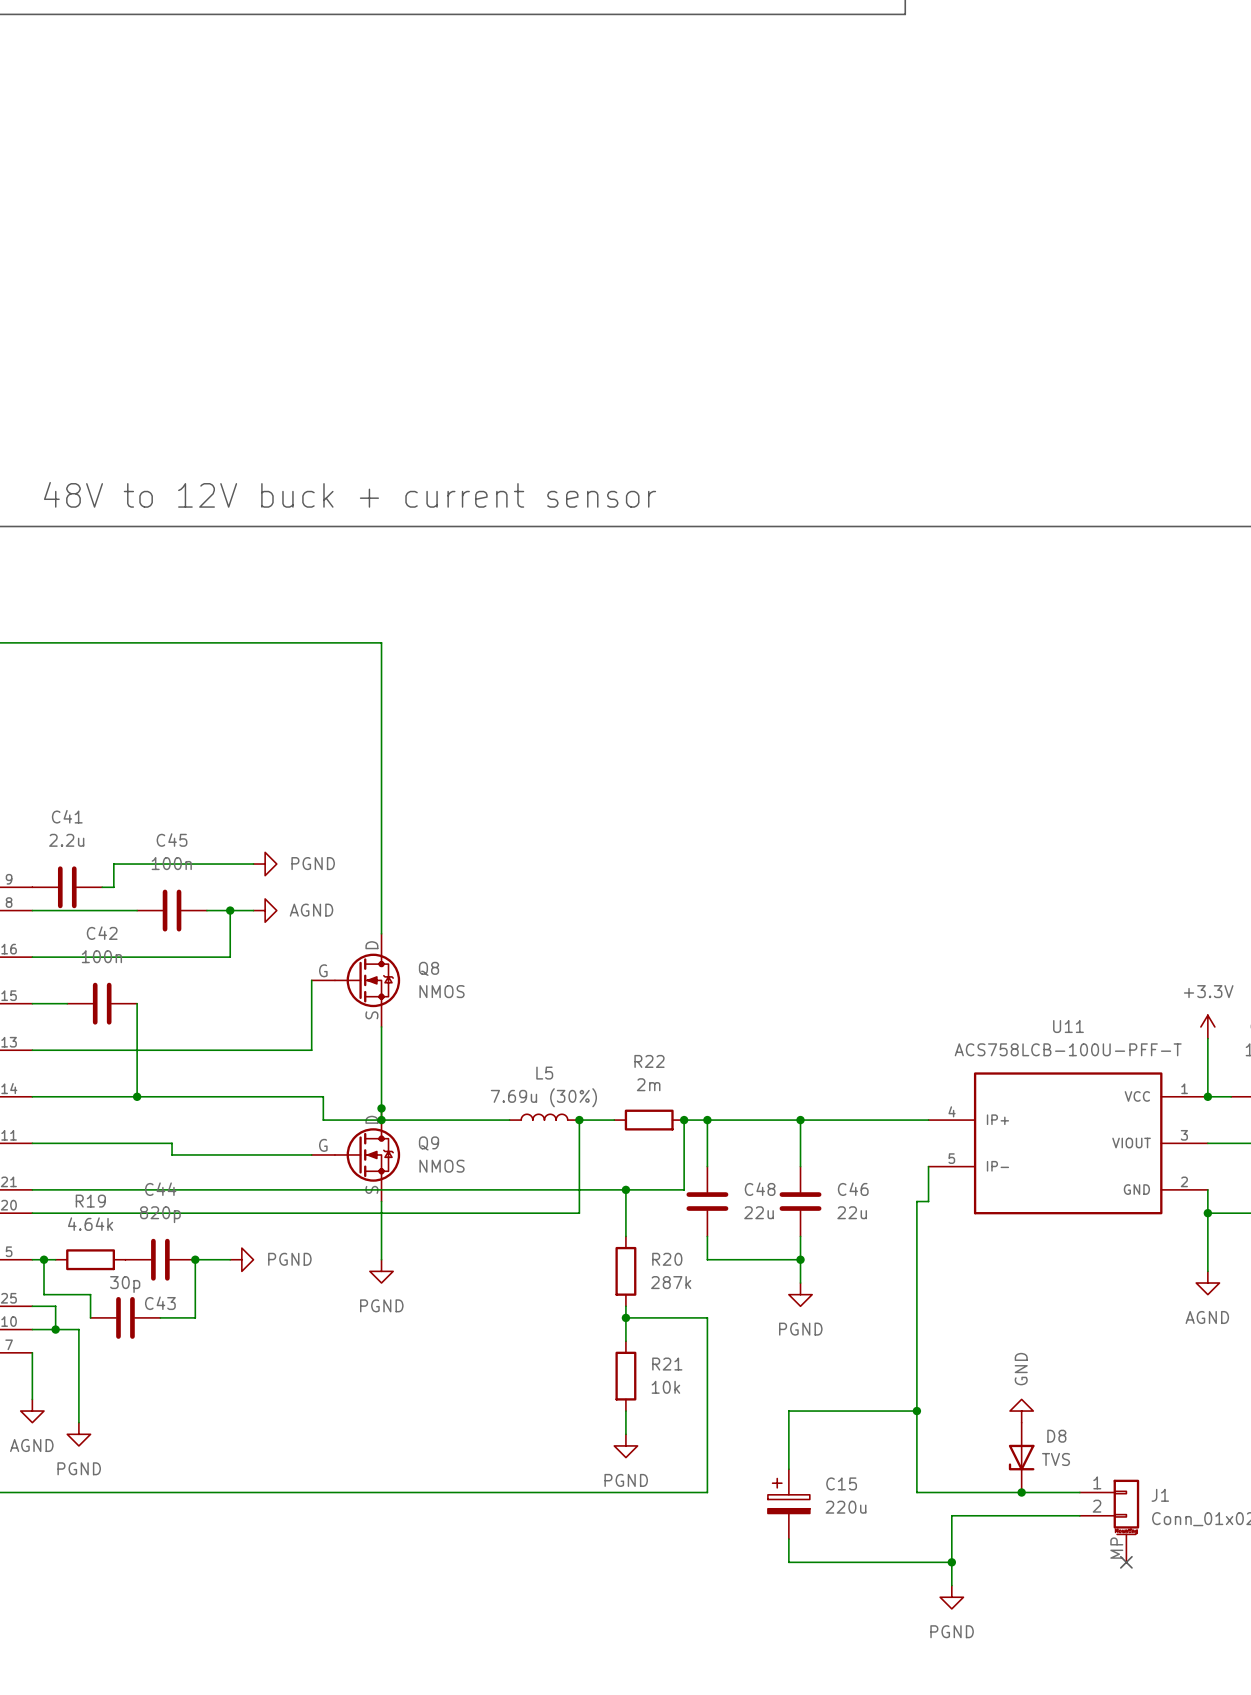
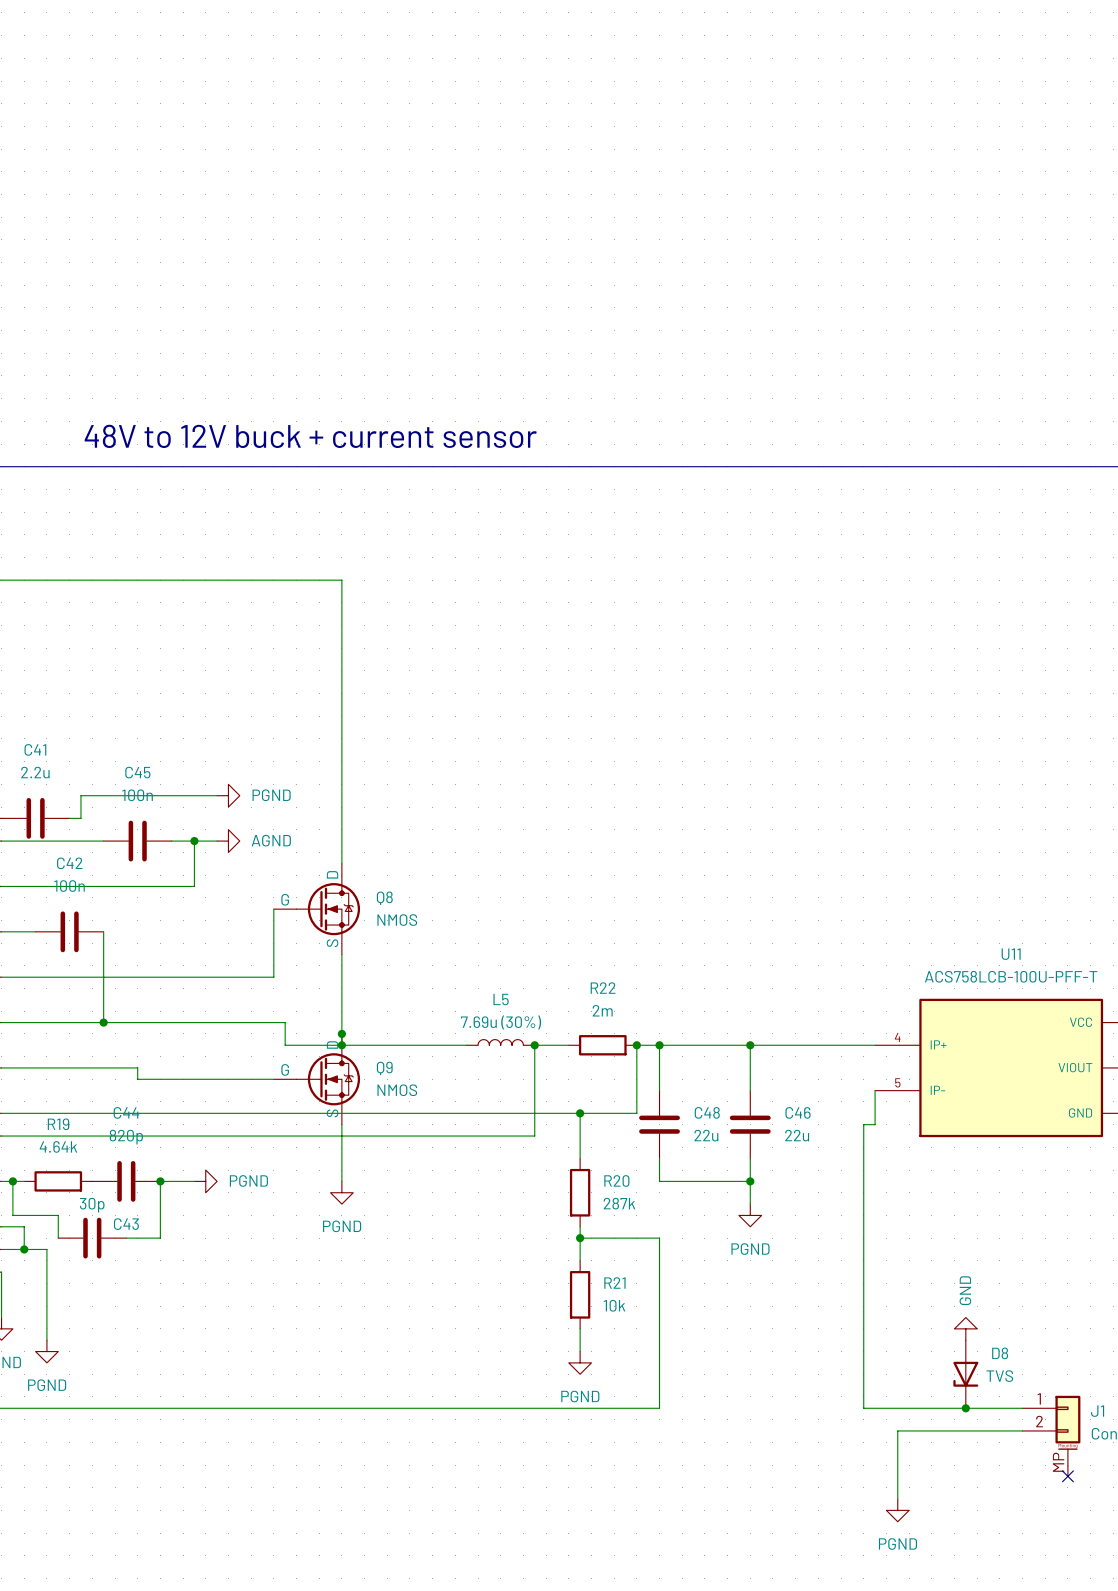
wire: (916, 1411) (788, 1411) (788, 1469) -> none
junction: (916, 1411) -> none
C15: 220u (788, 1504) -> none
wire: (788, 1539) (788, 1562) (951, 1562) -> none
junction: (951, 1562) -> none

